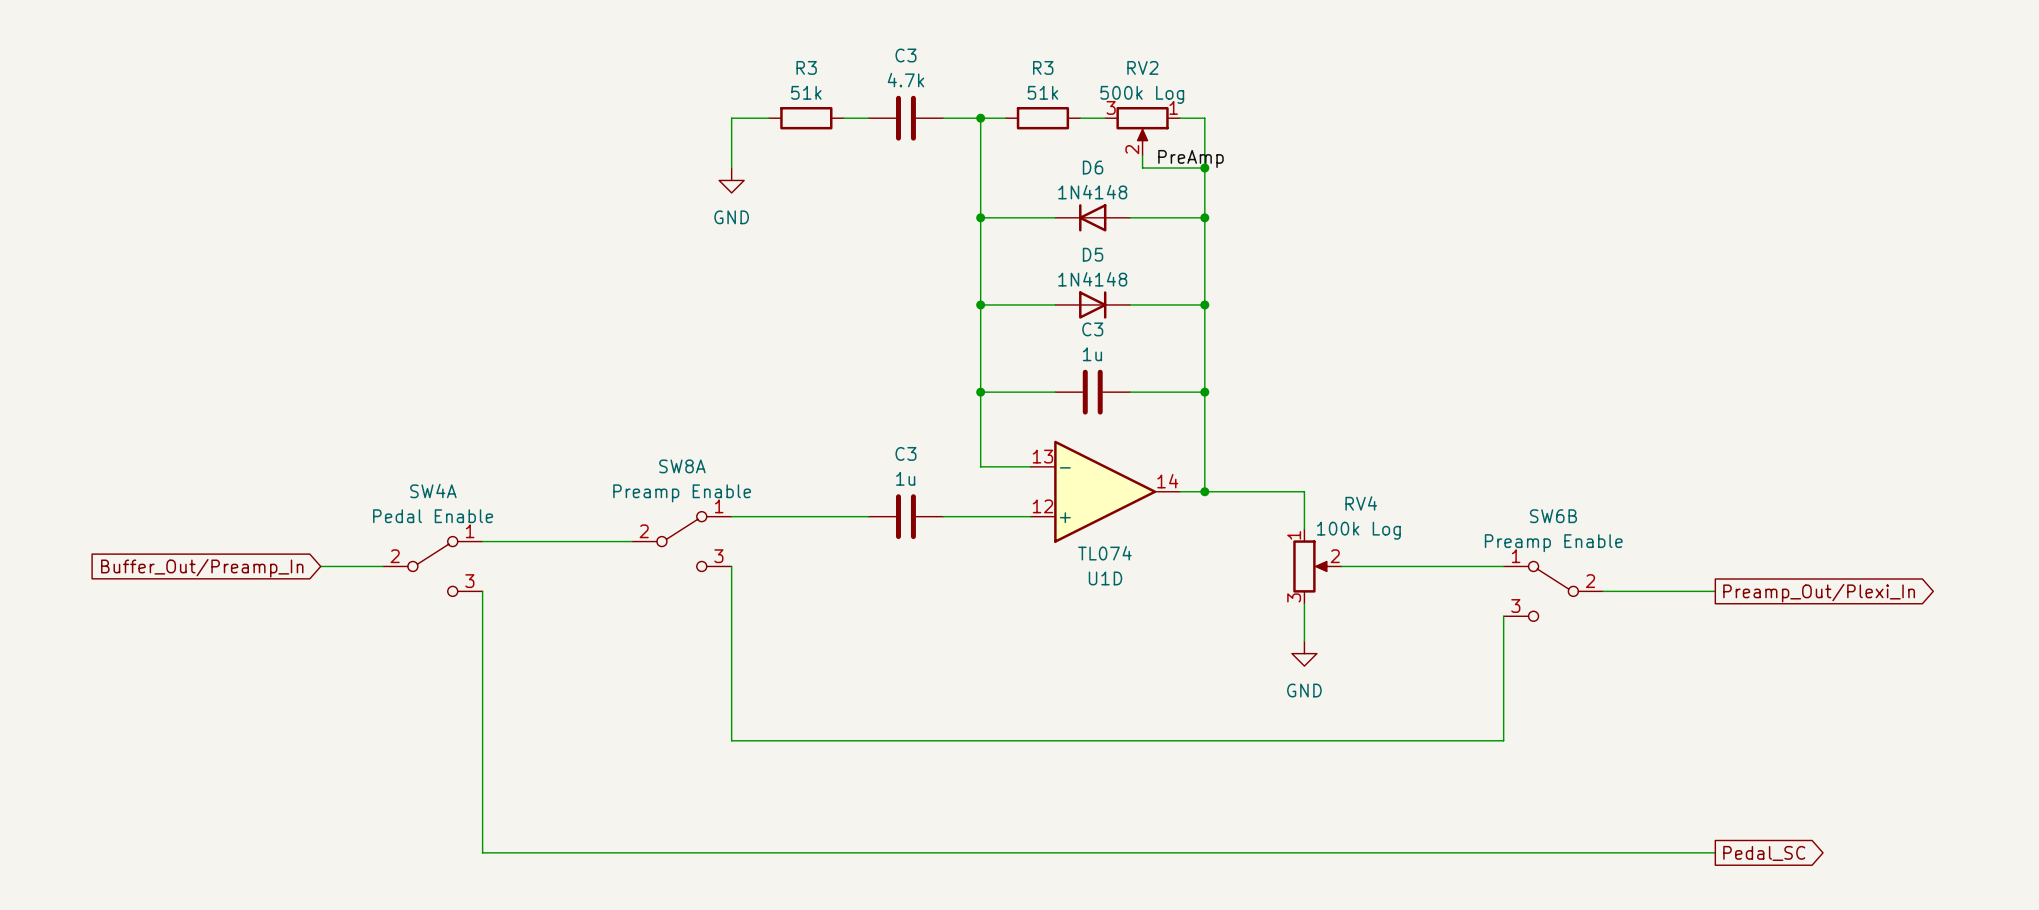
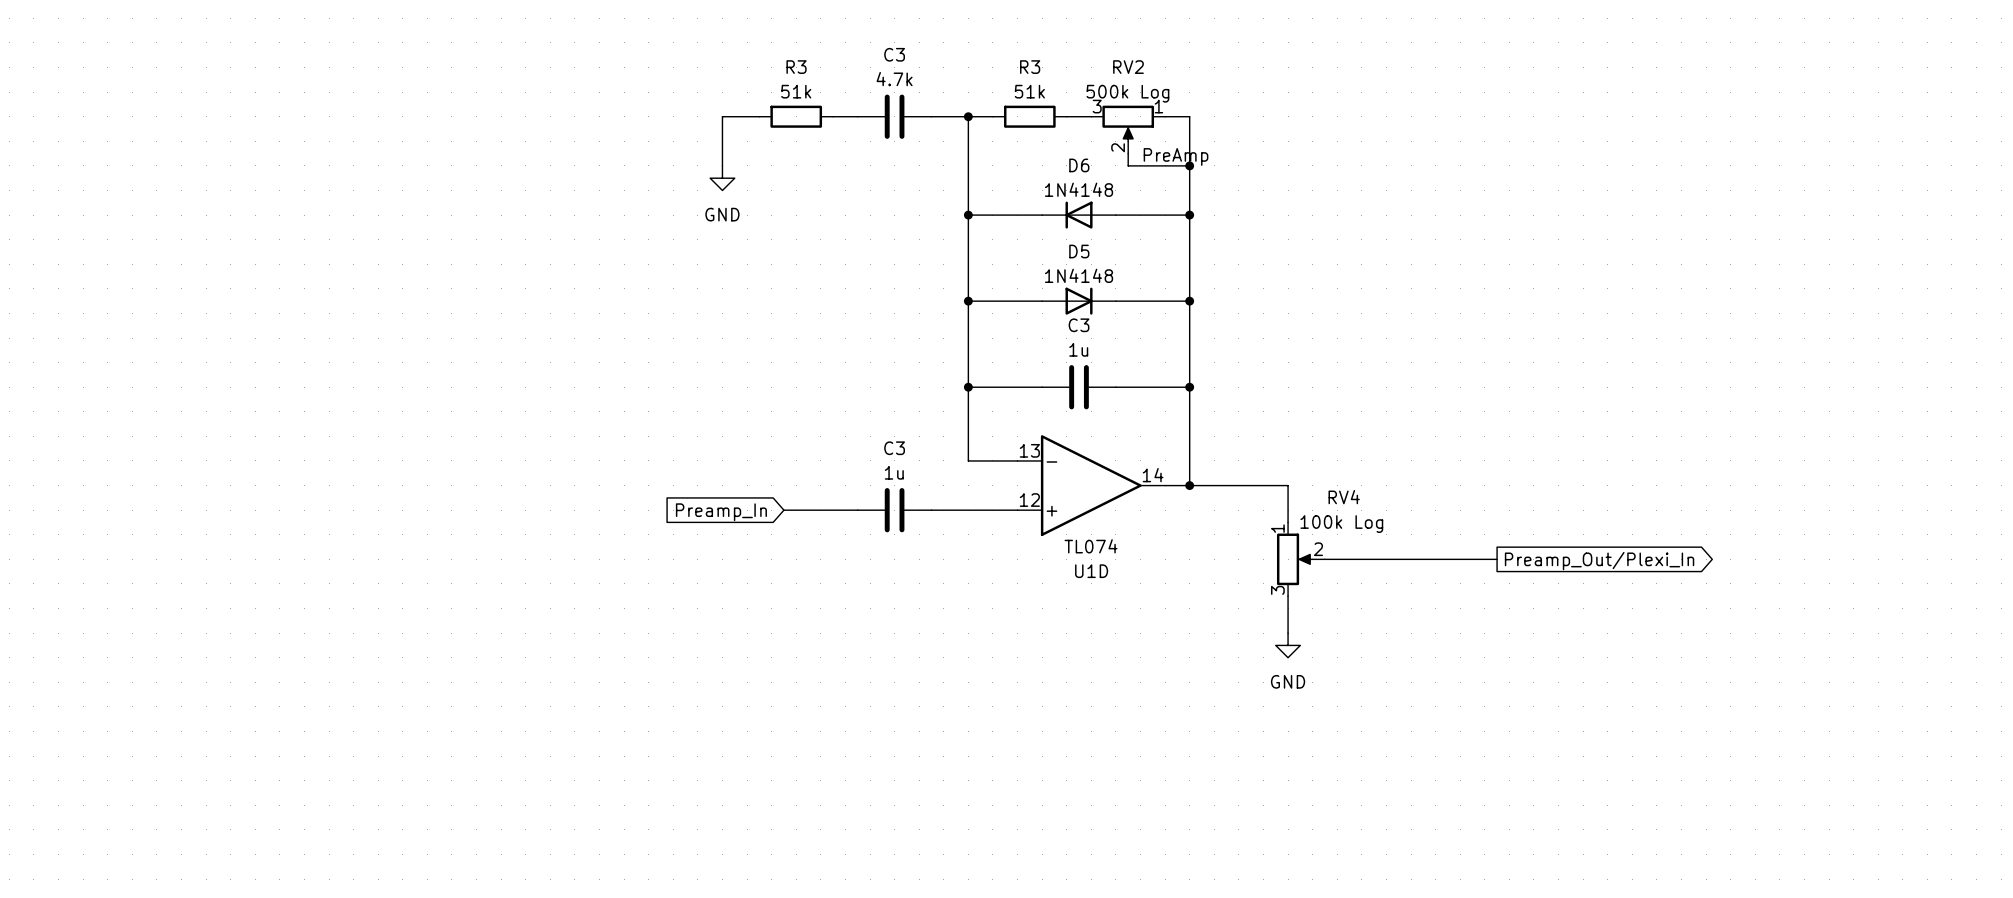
wire: (731, 516) (793, 516) -> none
global label: none -> Preamp_In (721, 512)
wire: (482, 541) (632, 541) -> none
SW8A: Preamp Enable (681, 541) -> none
wire: (320, 566) (382, 566) -> none
SW4A: Pedal Enable (432, 566) -> none
wire: (731, 566) (731, 740) (1503, 740) (1503, 616) -> none
global label: Buffer_Out/Preamp_In (202, 568) -> none
wire: (482, 591) (482, 852) (1715, 852) -> none
SW6B: Preamp Enable (1553, 591) -> none
wire: (1603, 591) (1715, 591) -> none
global label position: Preamp_Out/Plexi_In (1819, 593) -> Preamp_Out/Plexi_In (1599, 561)
global label: Pedal_SC (1764, 853) -> none

